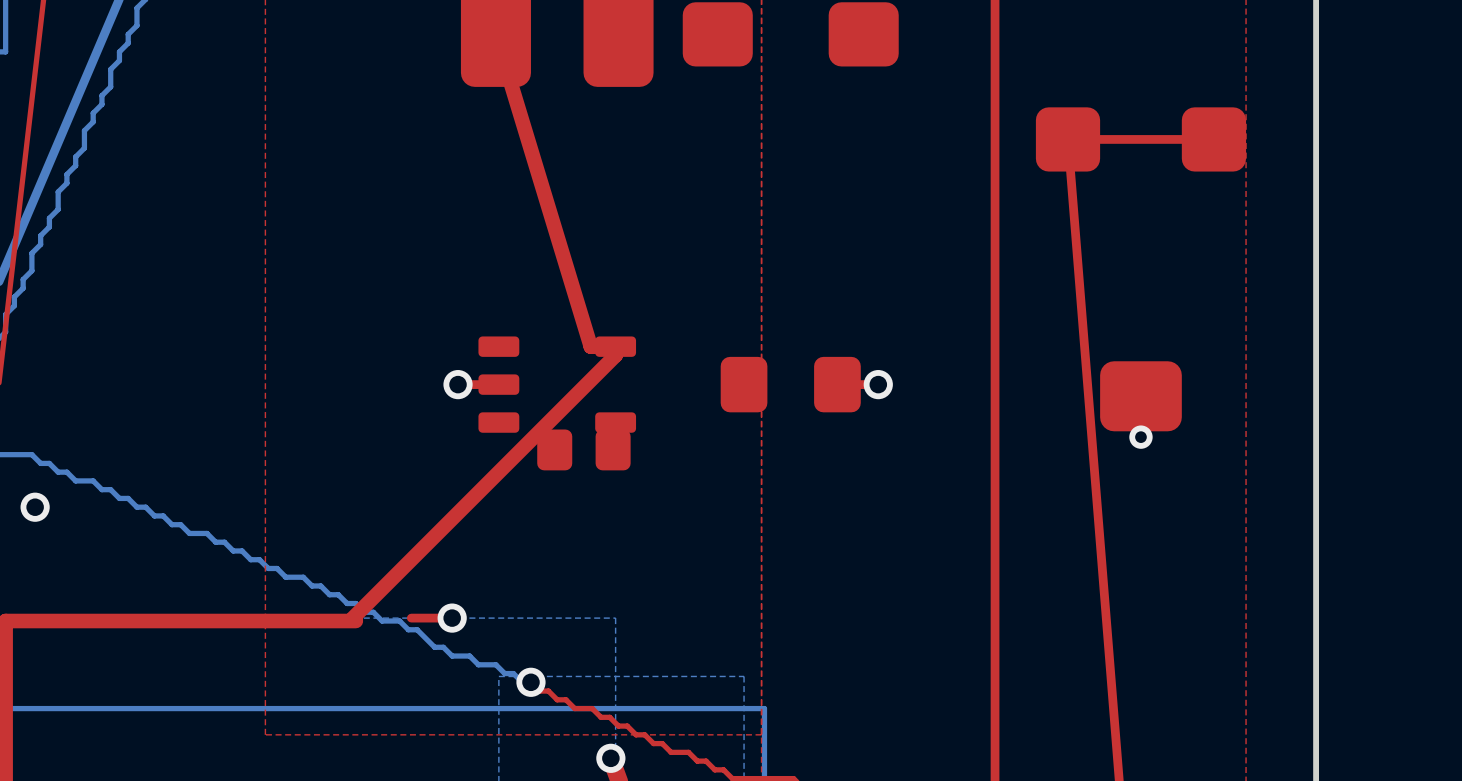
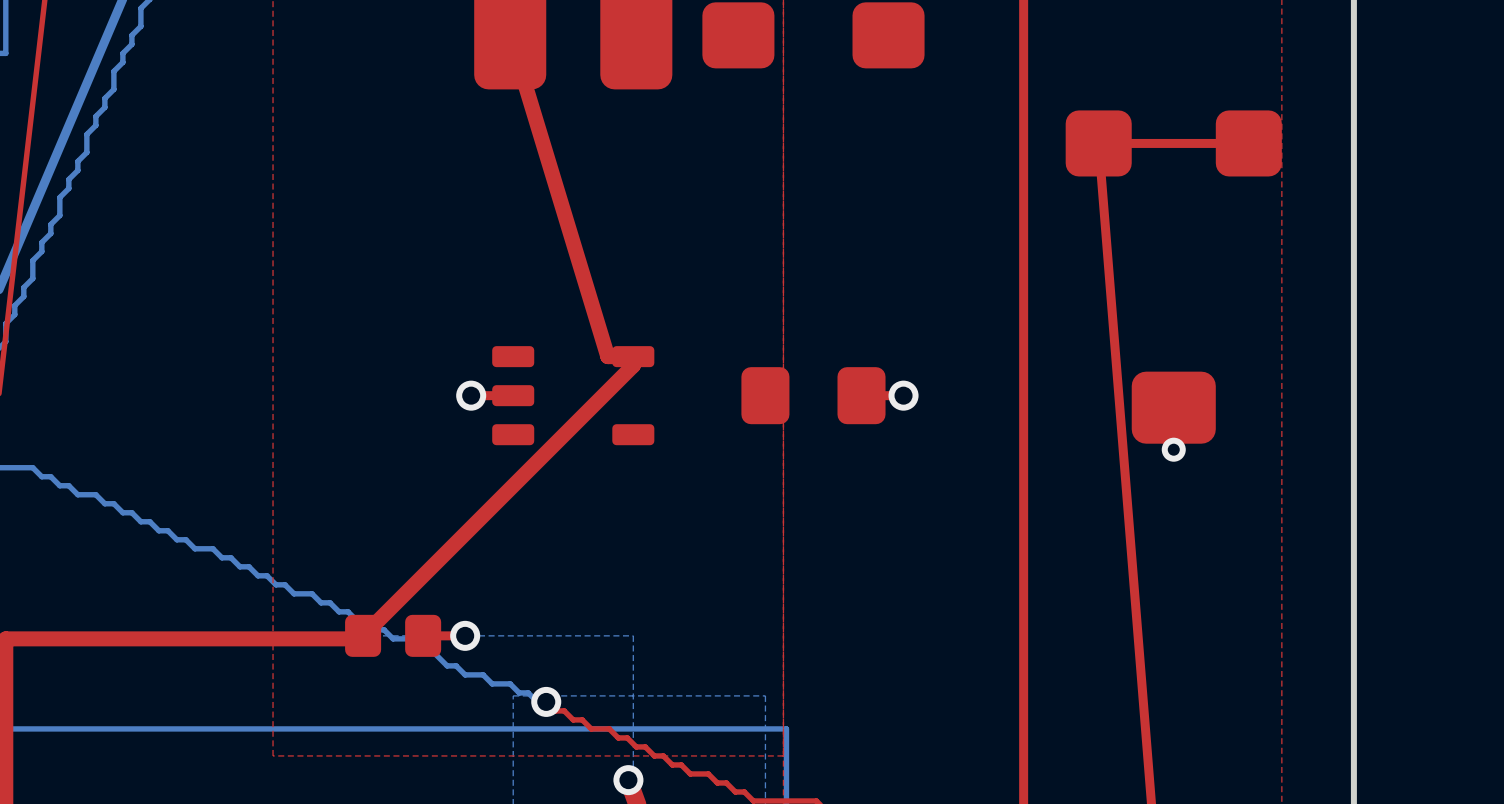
part position: (583, 449) -> (393, 635)
via: (35, 507) -> none

